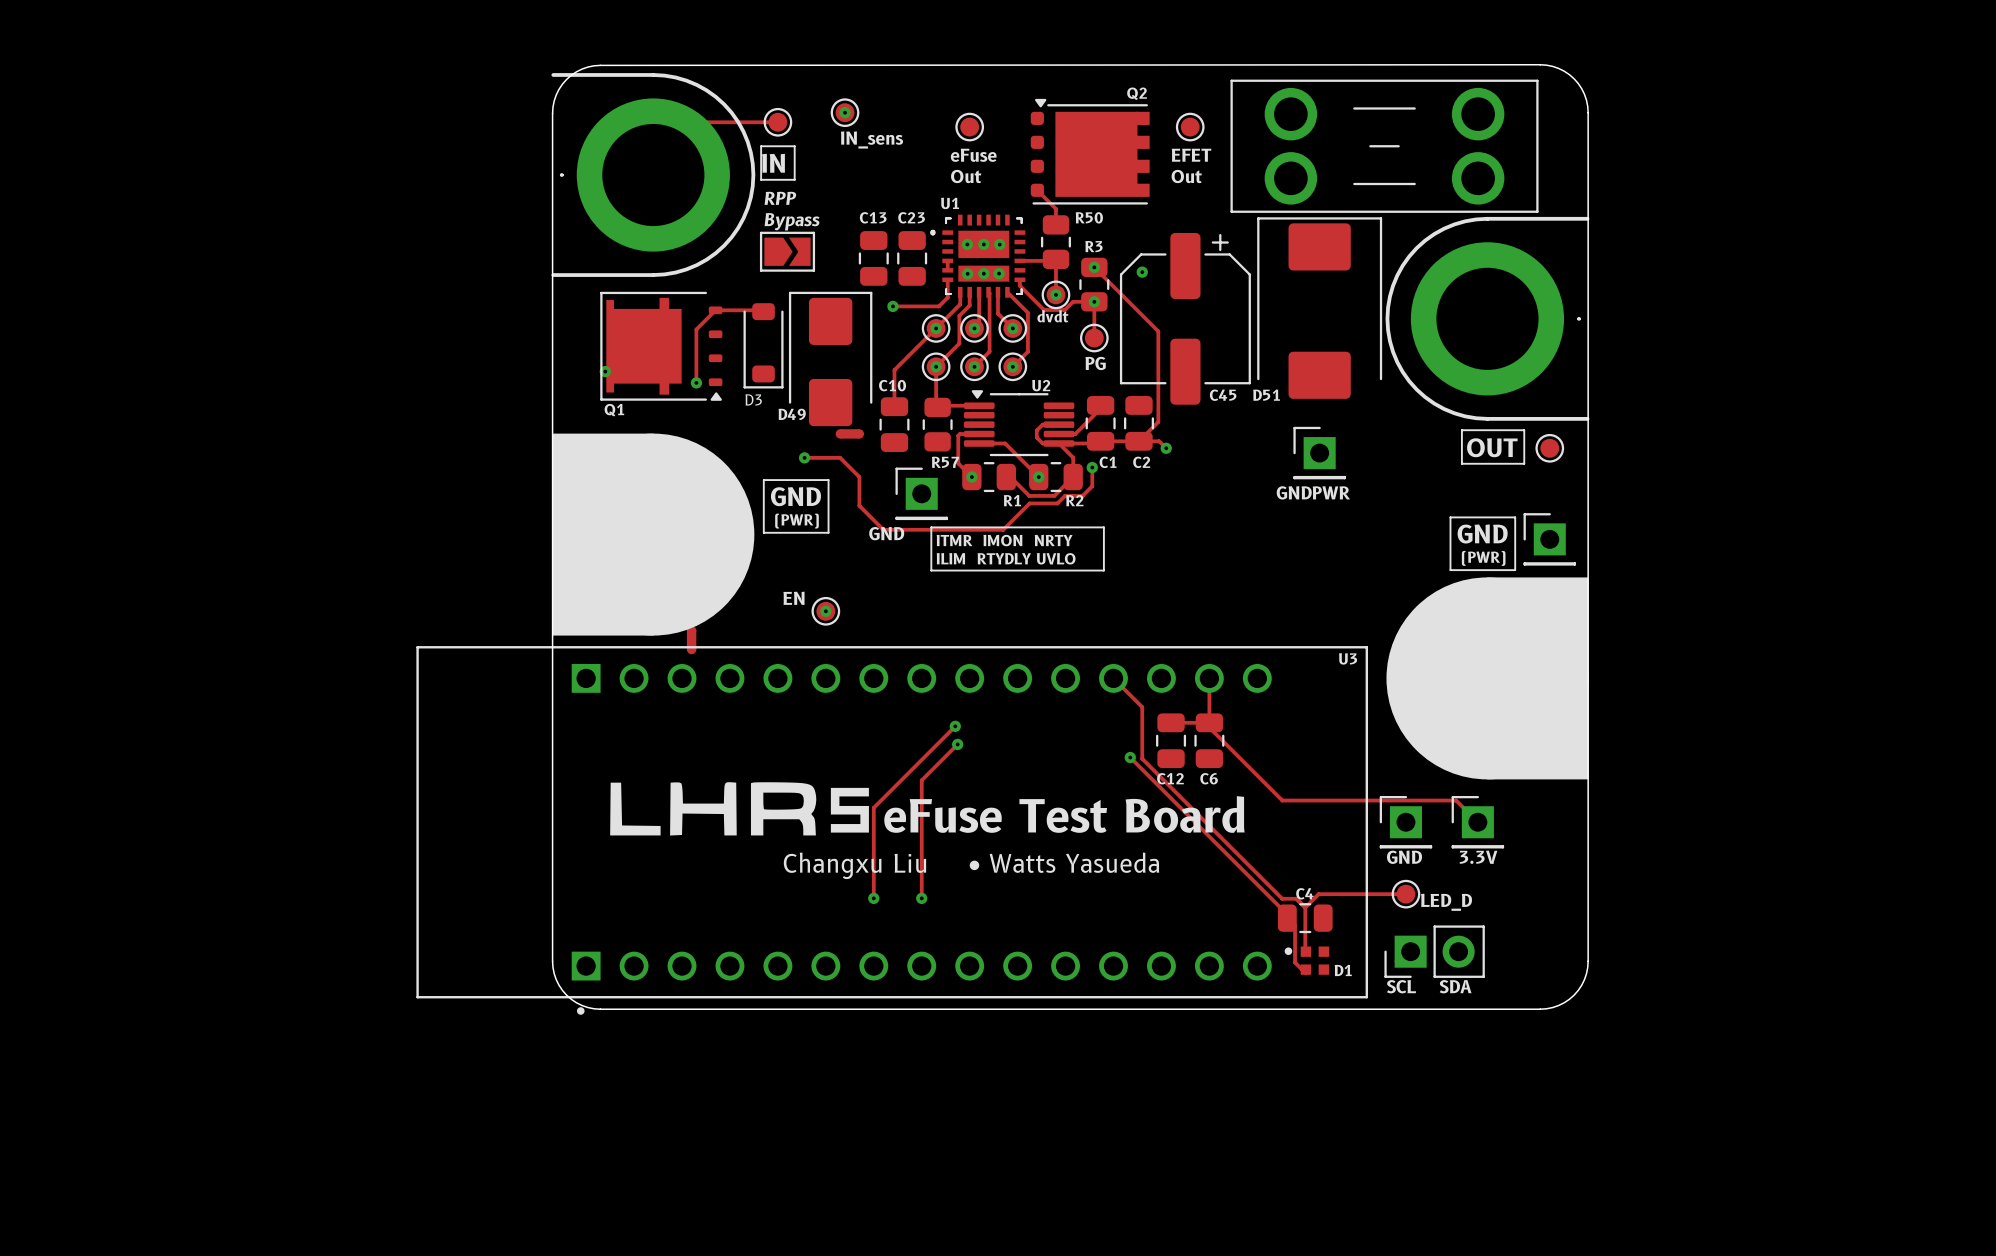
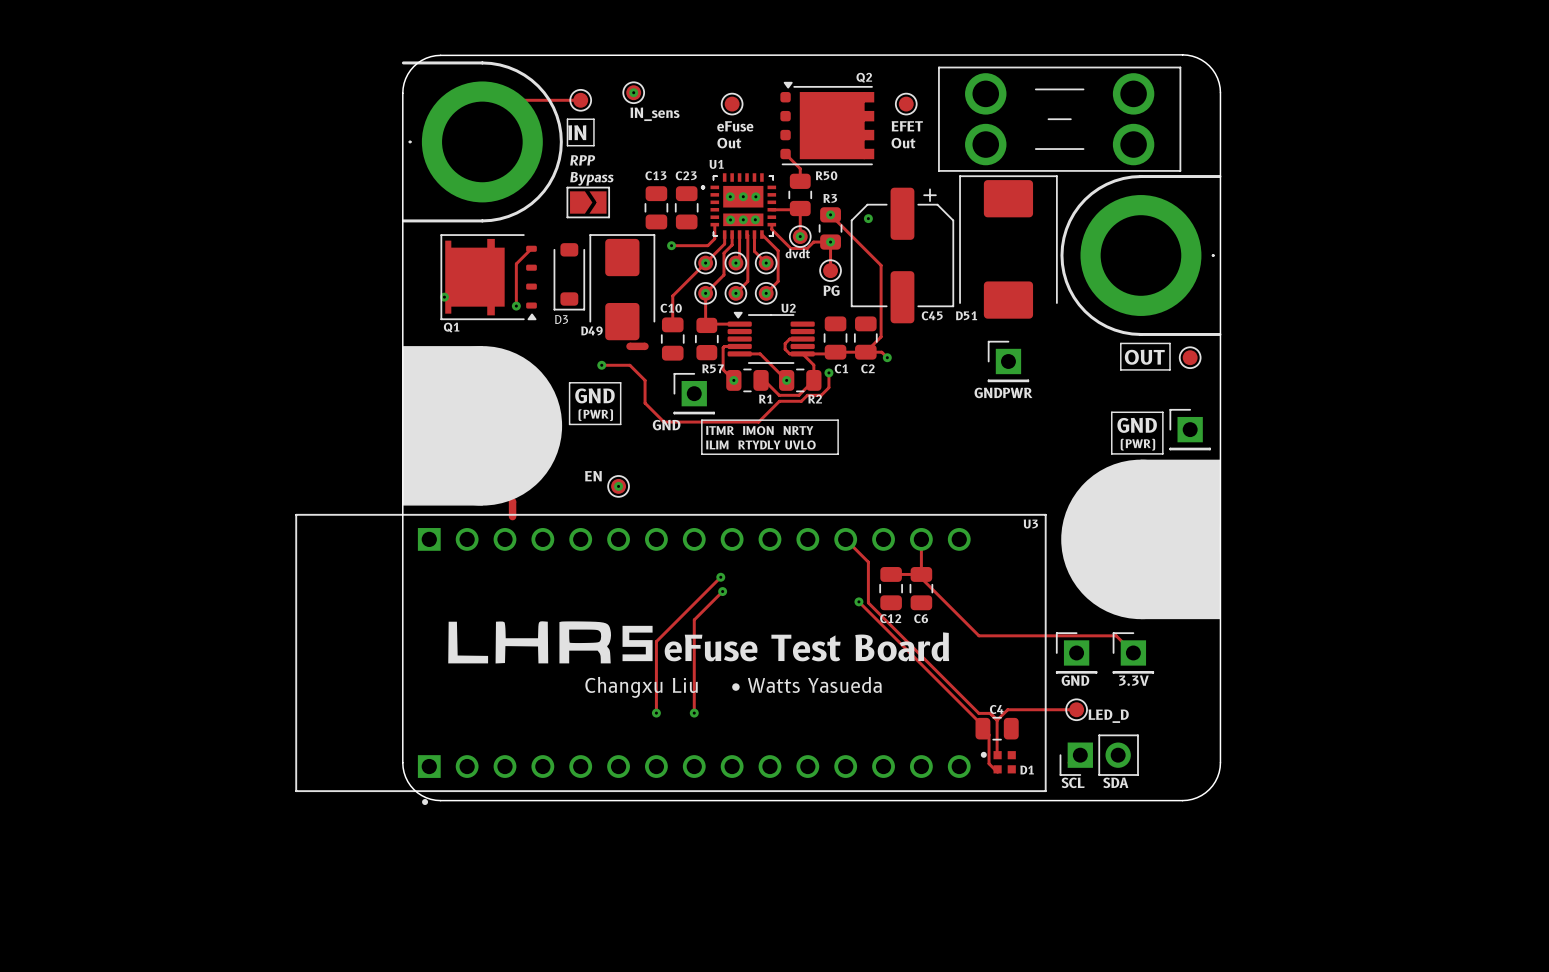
track: (947, 260) (947, 270) -> none
track: (715, 310) (763, 311) -> none
track: (1100, 405) (1100, 408) (1075, 434) (1059, 434) -> none

